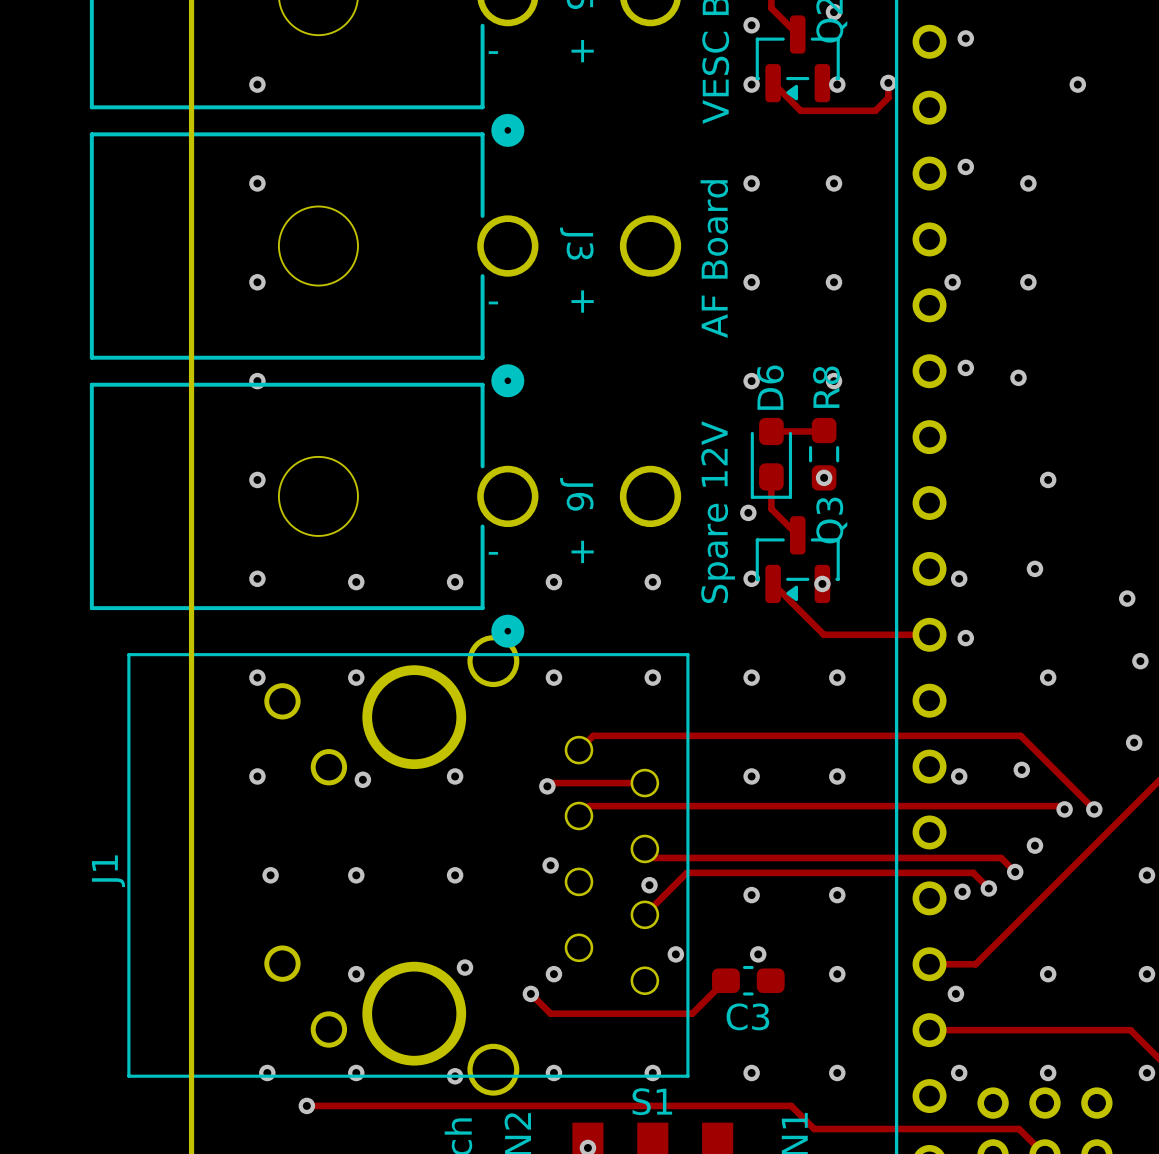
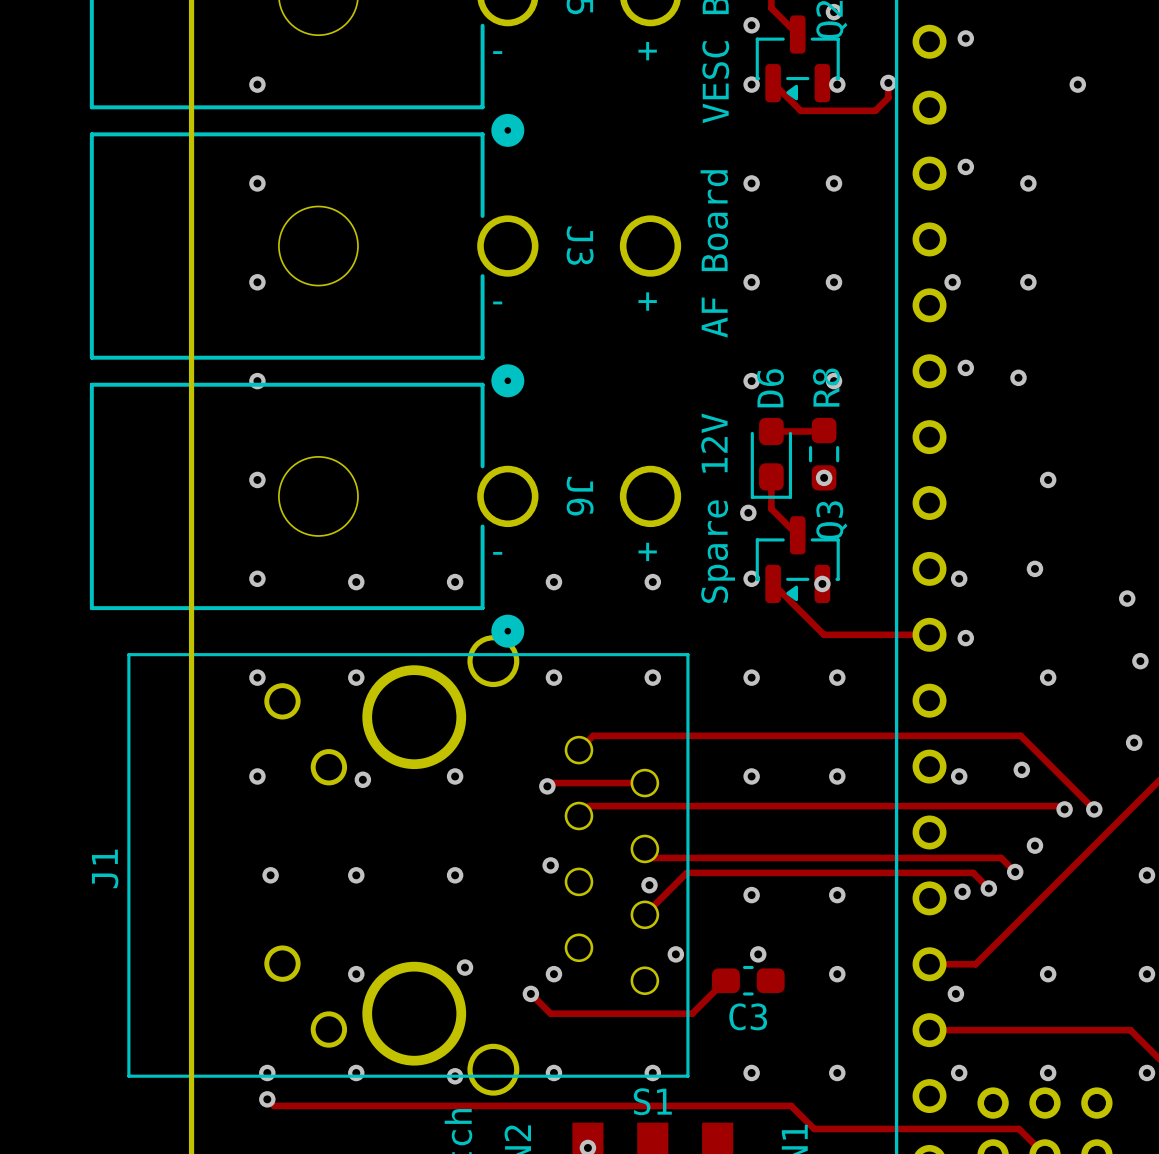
track: none -> (267, 1099) (273, 1105) (306, 1105)
via position: (306, 1105) -> (267, 1099)

